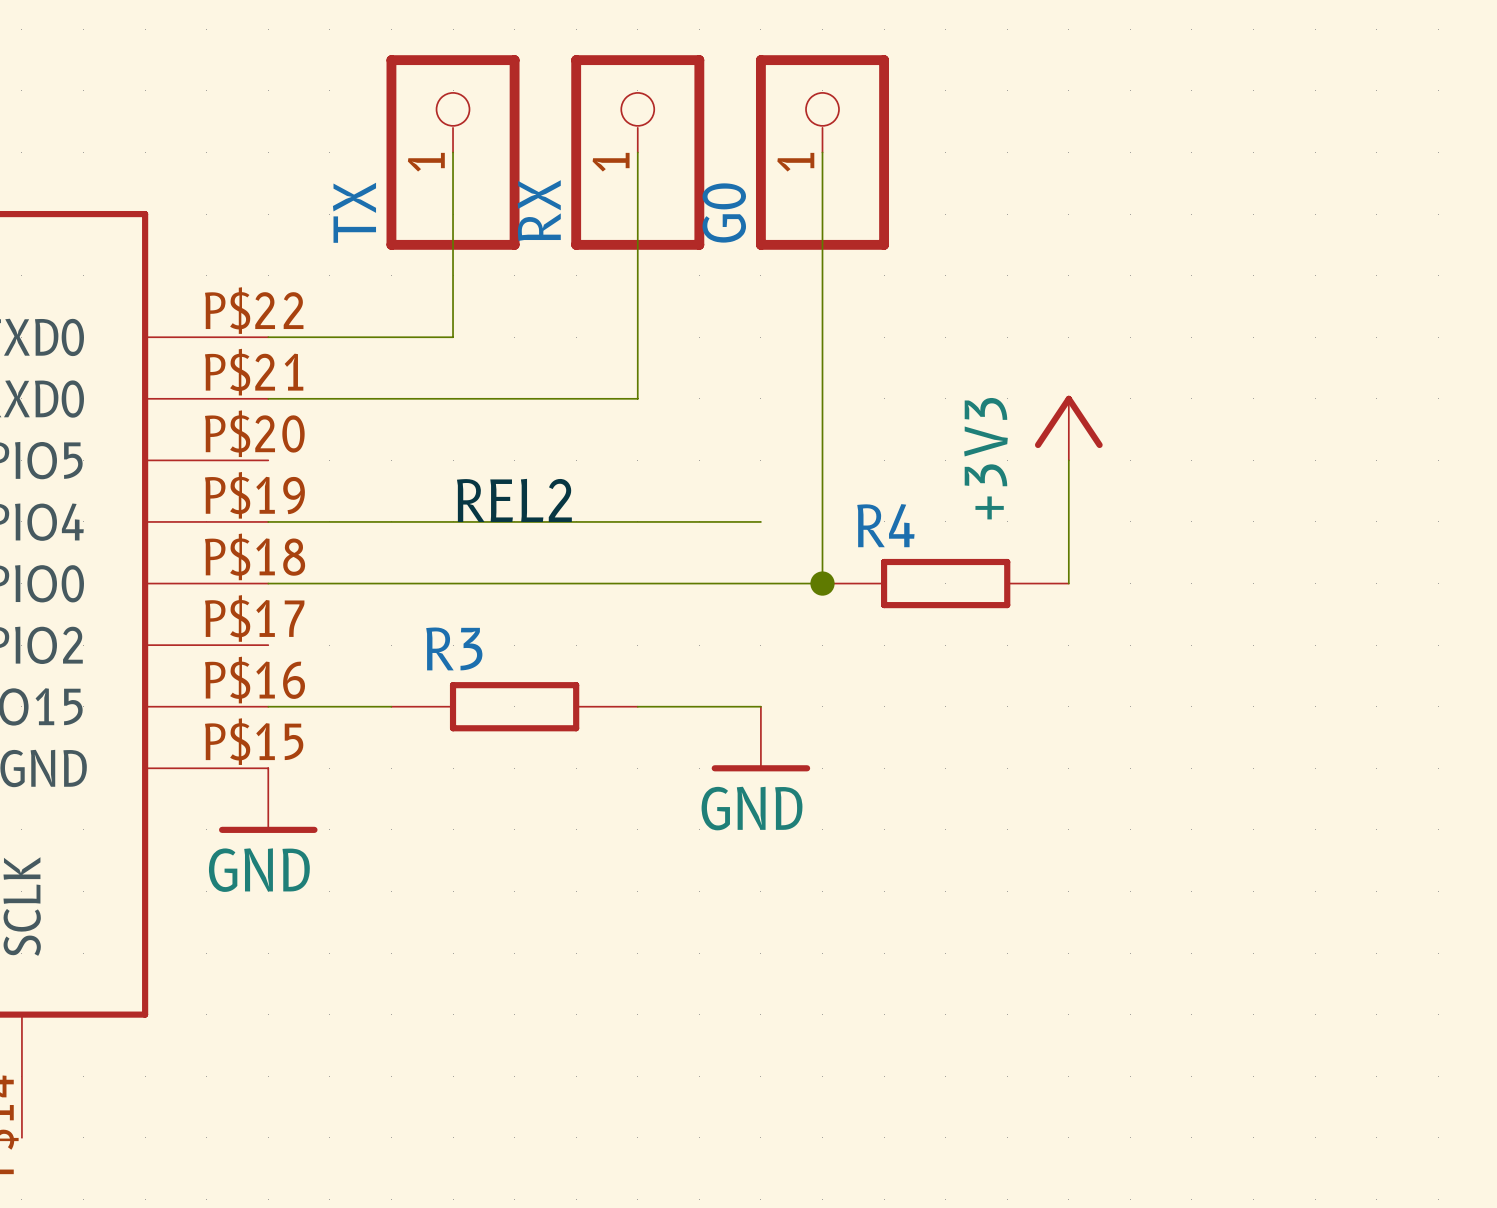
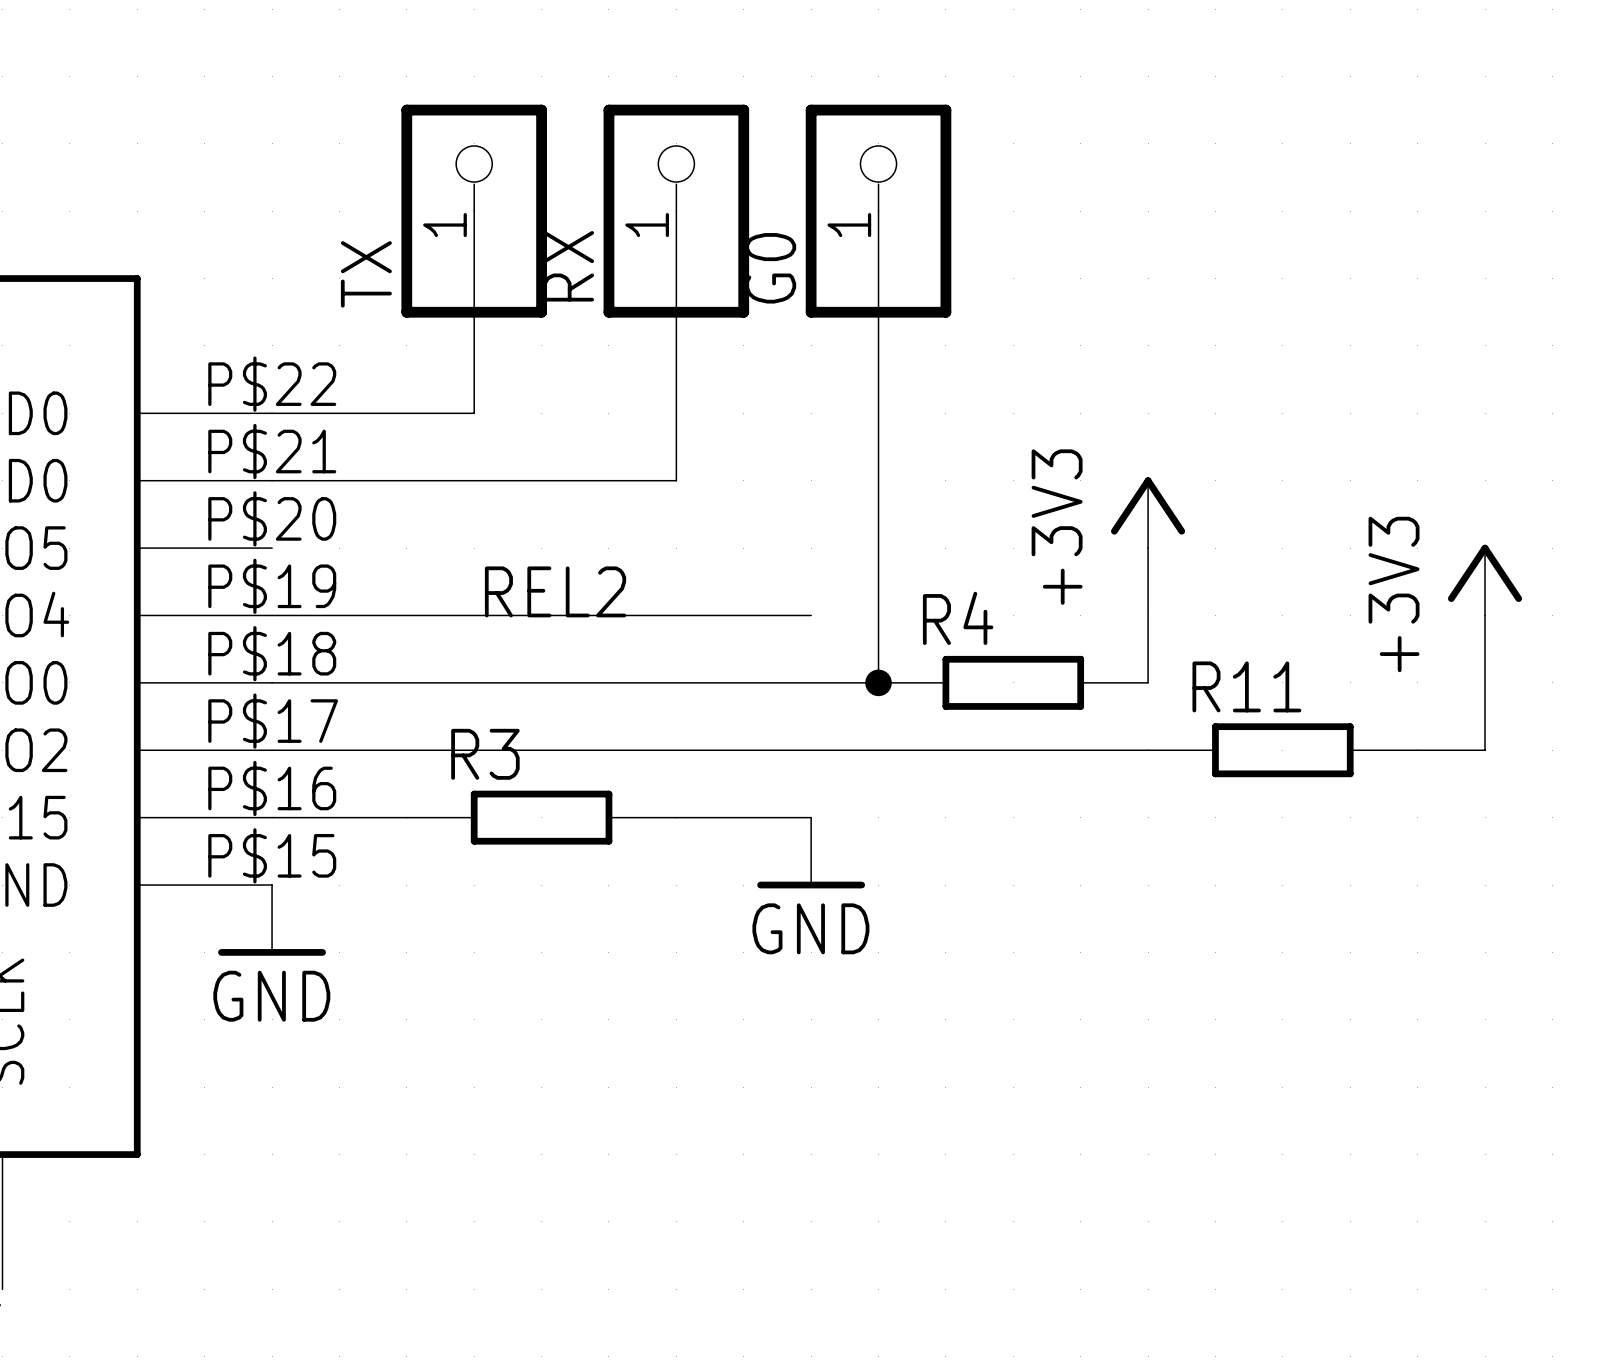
power symbol: none -> +3V3 (1485, 580)
wire: none -> (1485, 615) (1485, 750) (1417, 750)
wire: none -> (272, 750) (1148, 750)
R11: none -> (1282, 750)

